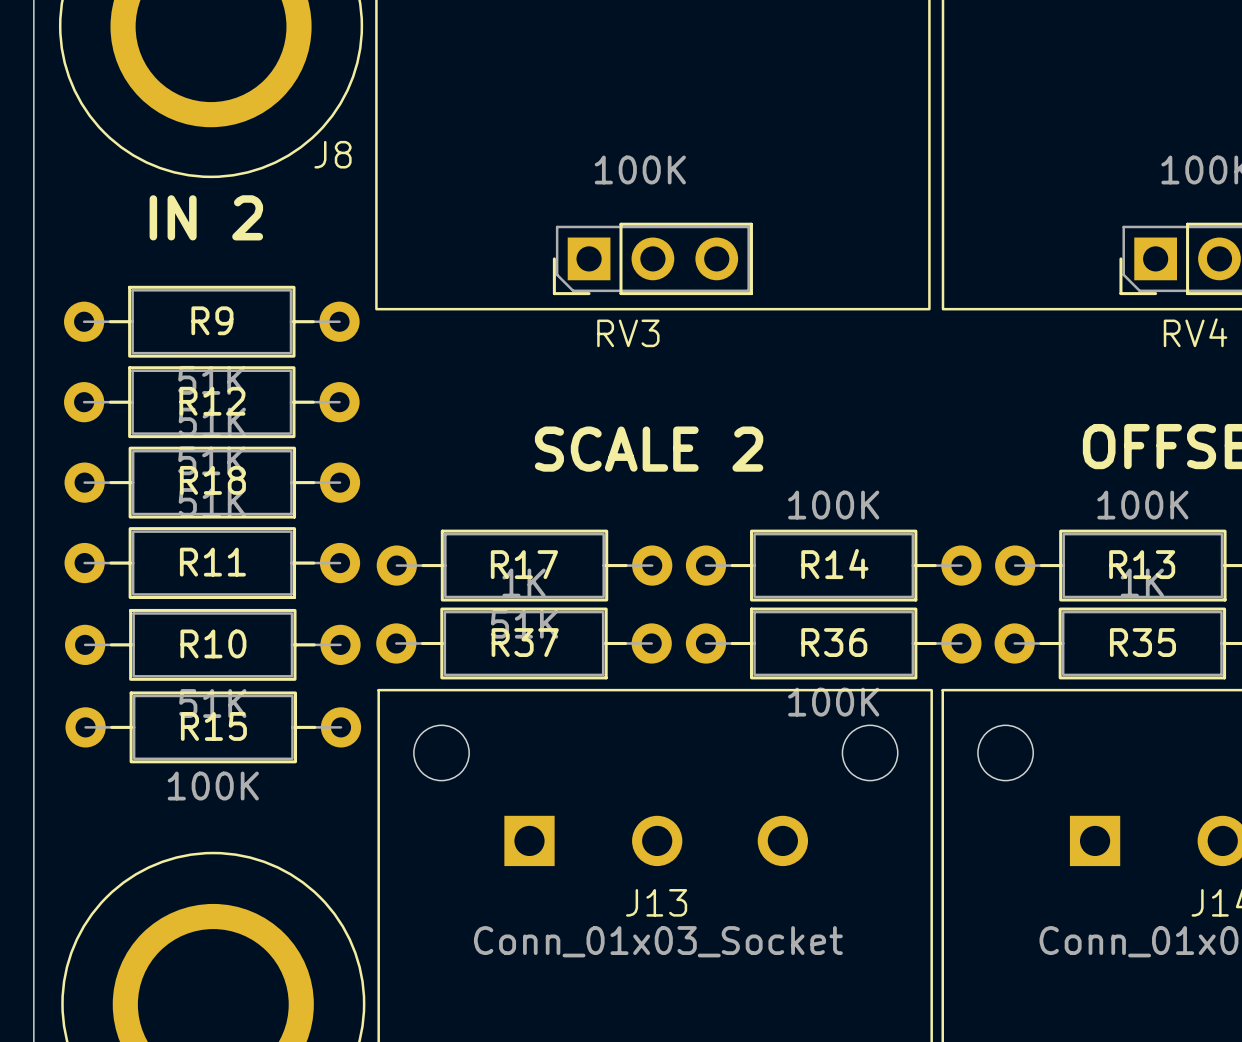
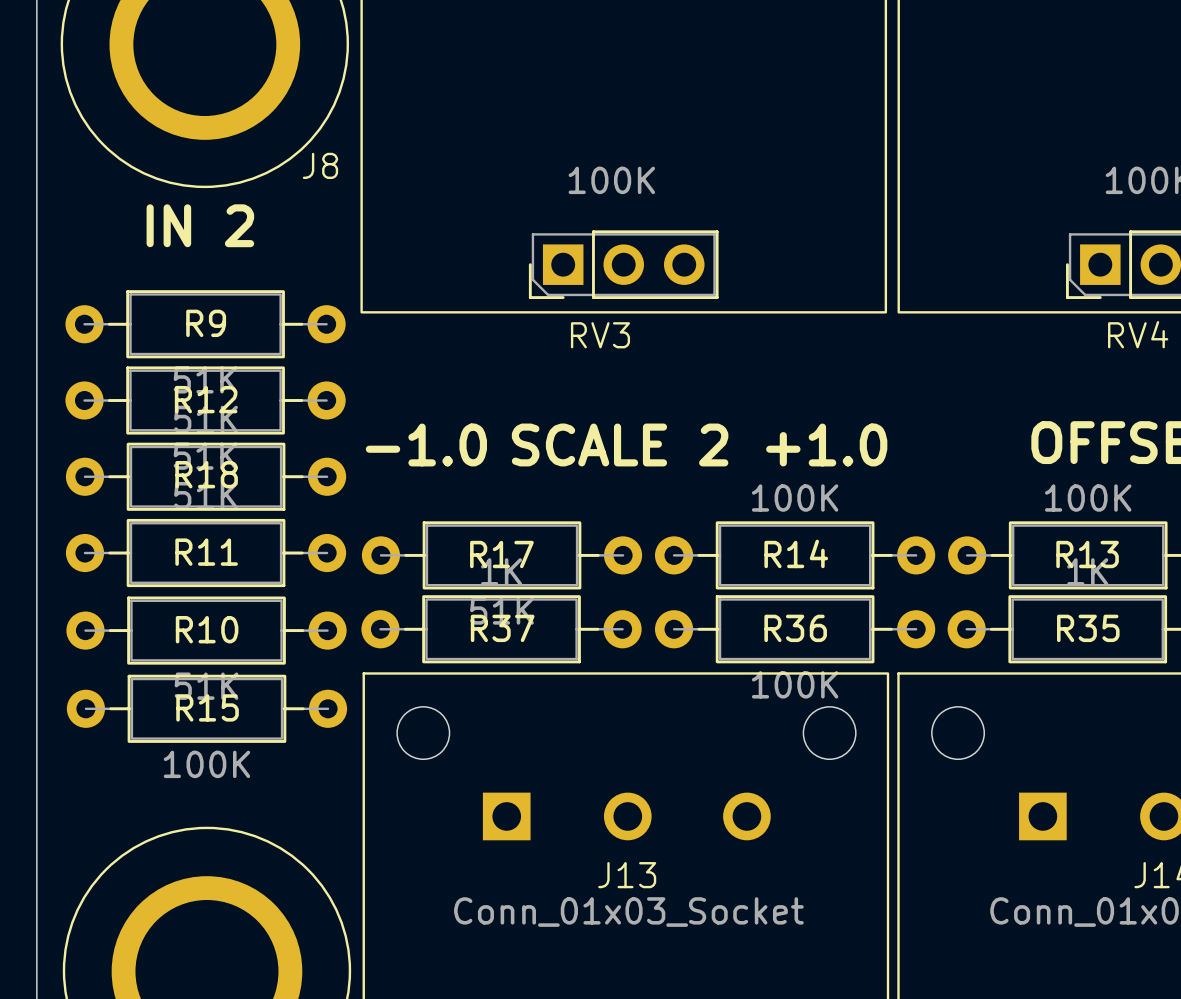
text: none -> -1.0 (426, 444)
text: none -> +1.0 (826, 444)

